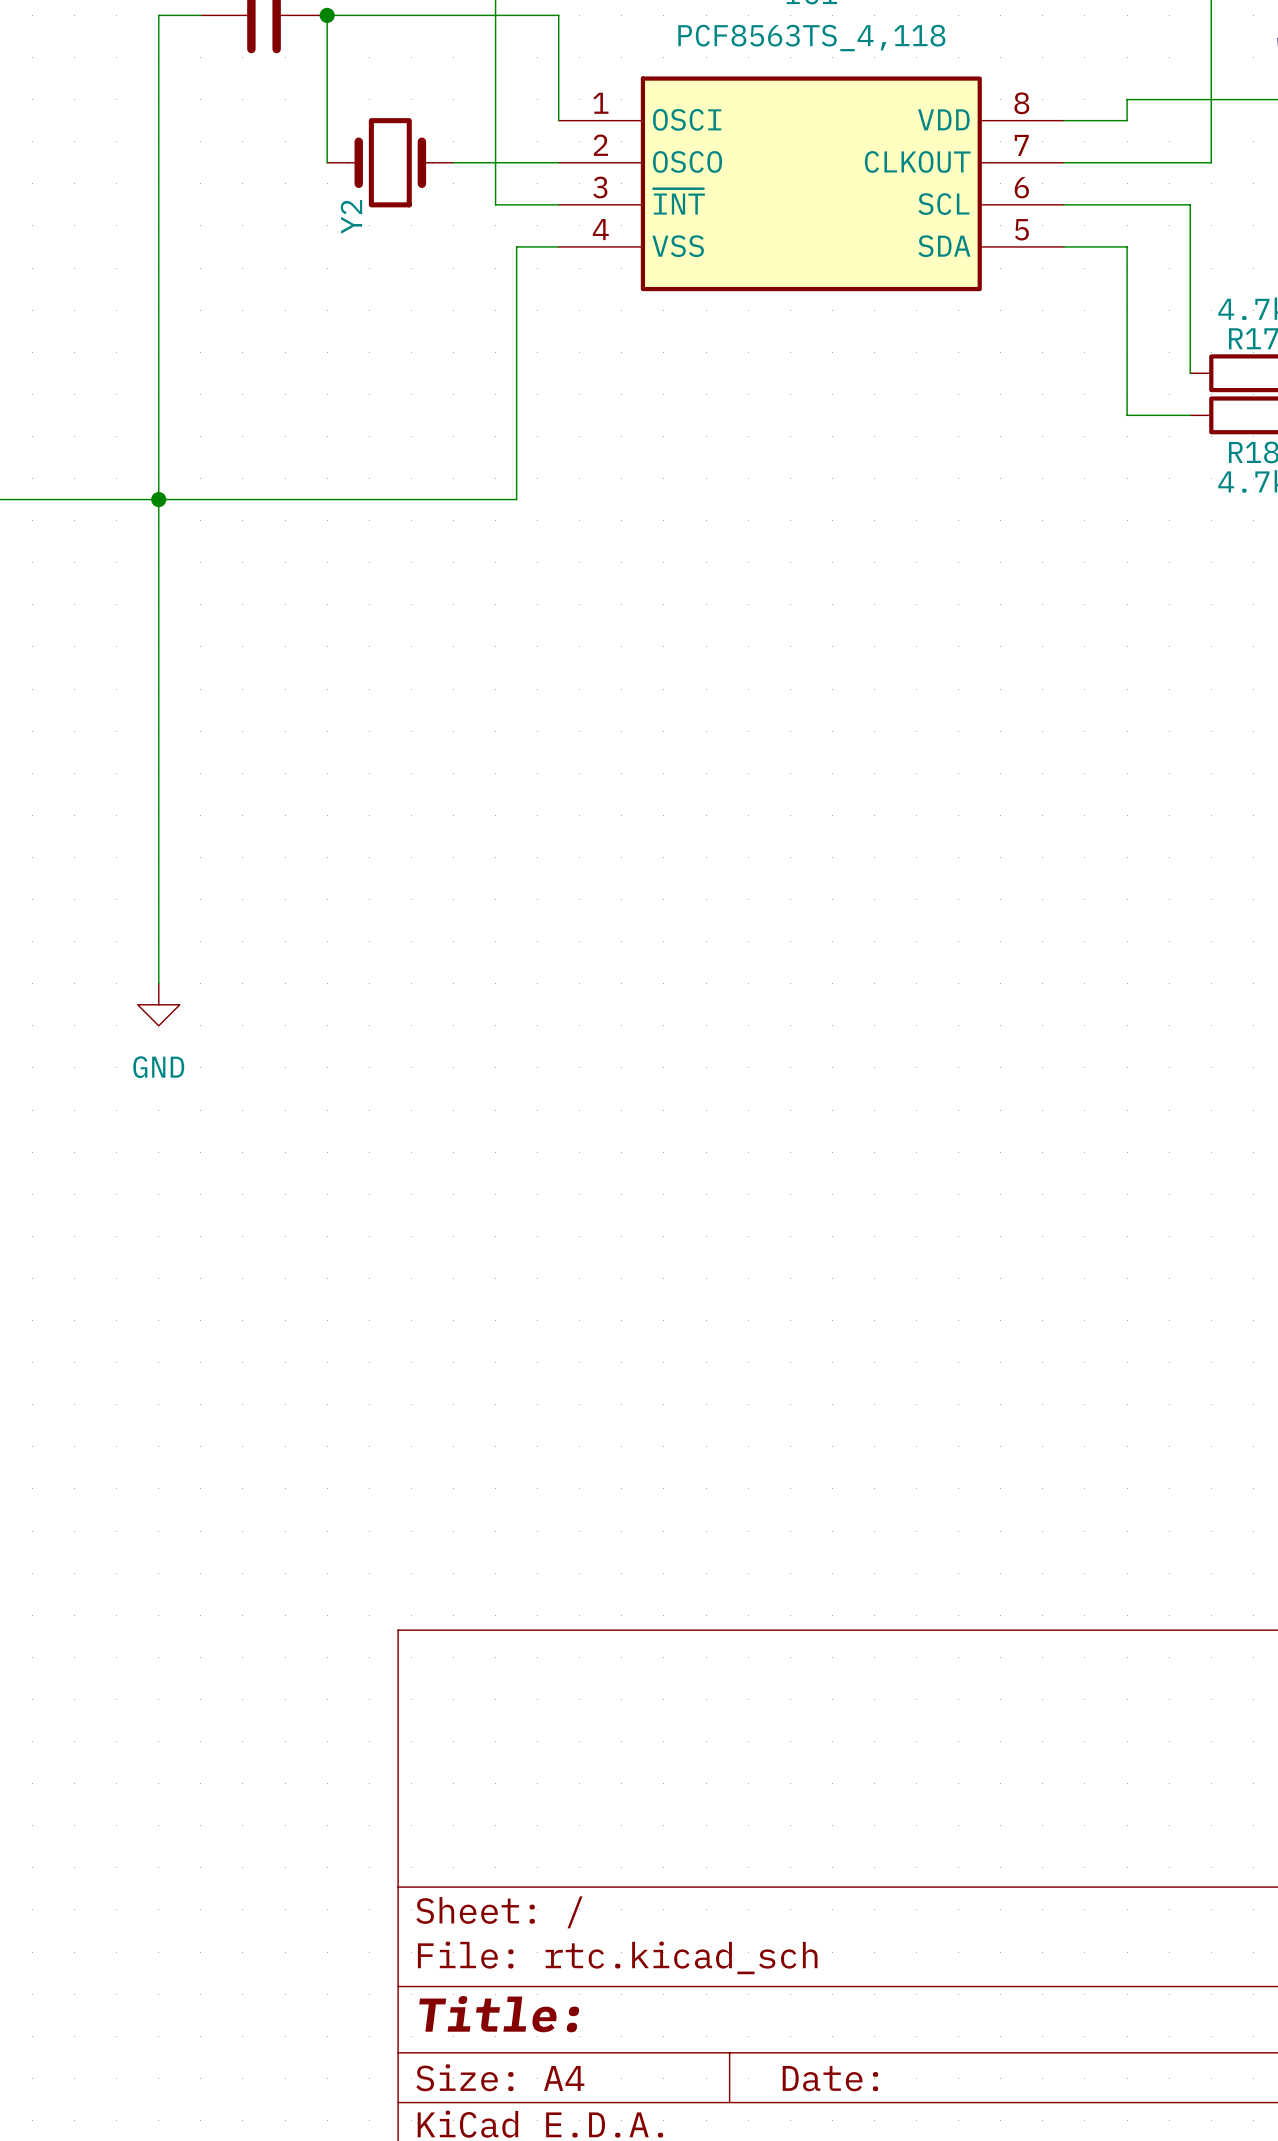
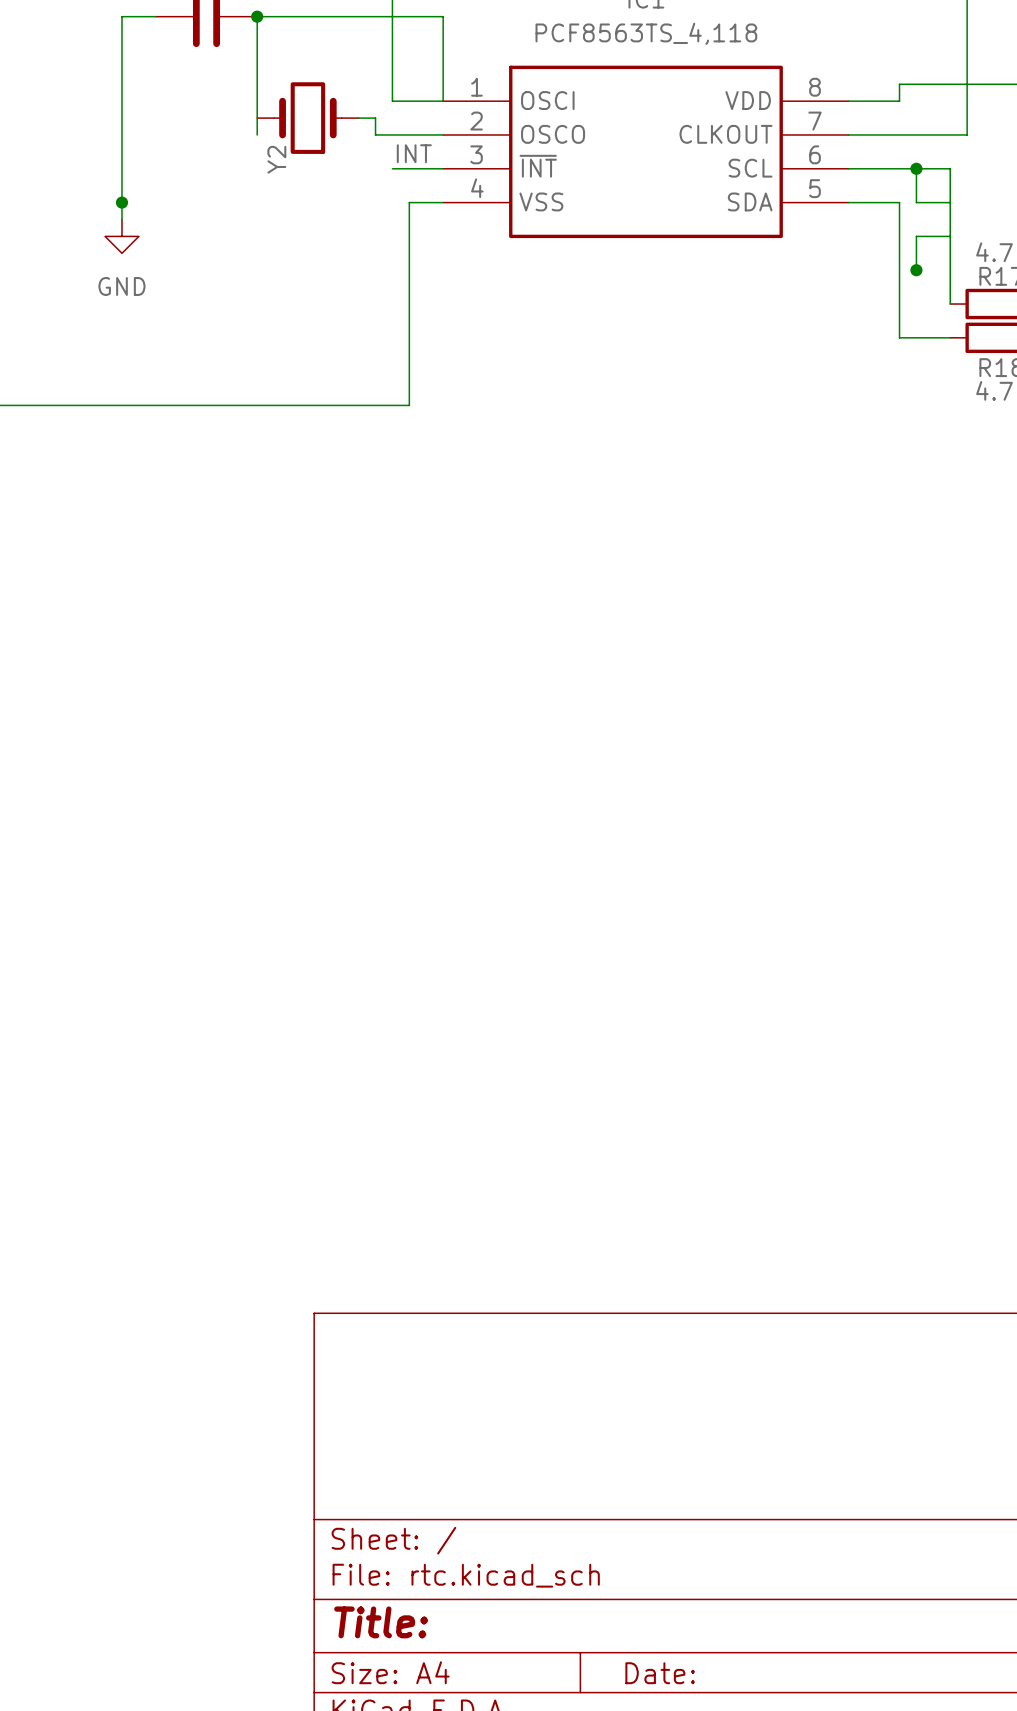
wire: (495, 120) (495, 204) -> (392, 101) (443, 101)
Y2 position: (390, 162) -> (307, 118)
wire: (453, 162) (474, 162) -> (358, 118) (375, 118) (375, 134)
label: none -> INT (414, 153)
wire: none -> (916, 168) (916, 202) (950, 202)
junction: none -> (916, 168)
junction: none -> (121, 202)
wire: (158, 268) (158, 983) -> none
power symbol: none -> GND (121, 236)
wire: none -> (950, 236) (916, 236) (916, 270)
junction: none -> (916, 270)
junction: (158, 499) -> none
power symbol: GND (158, 1004) -> none

